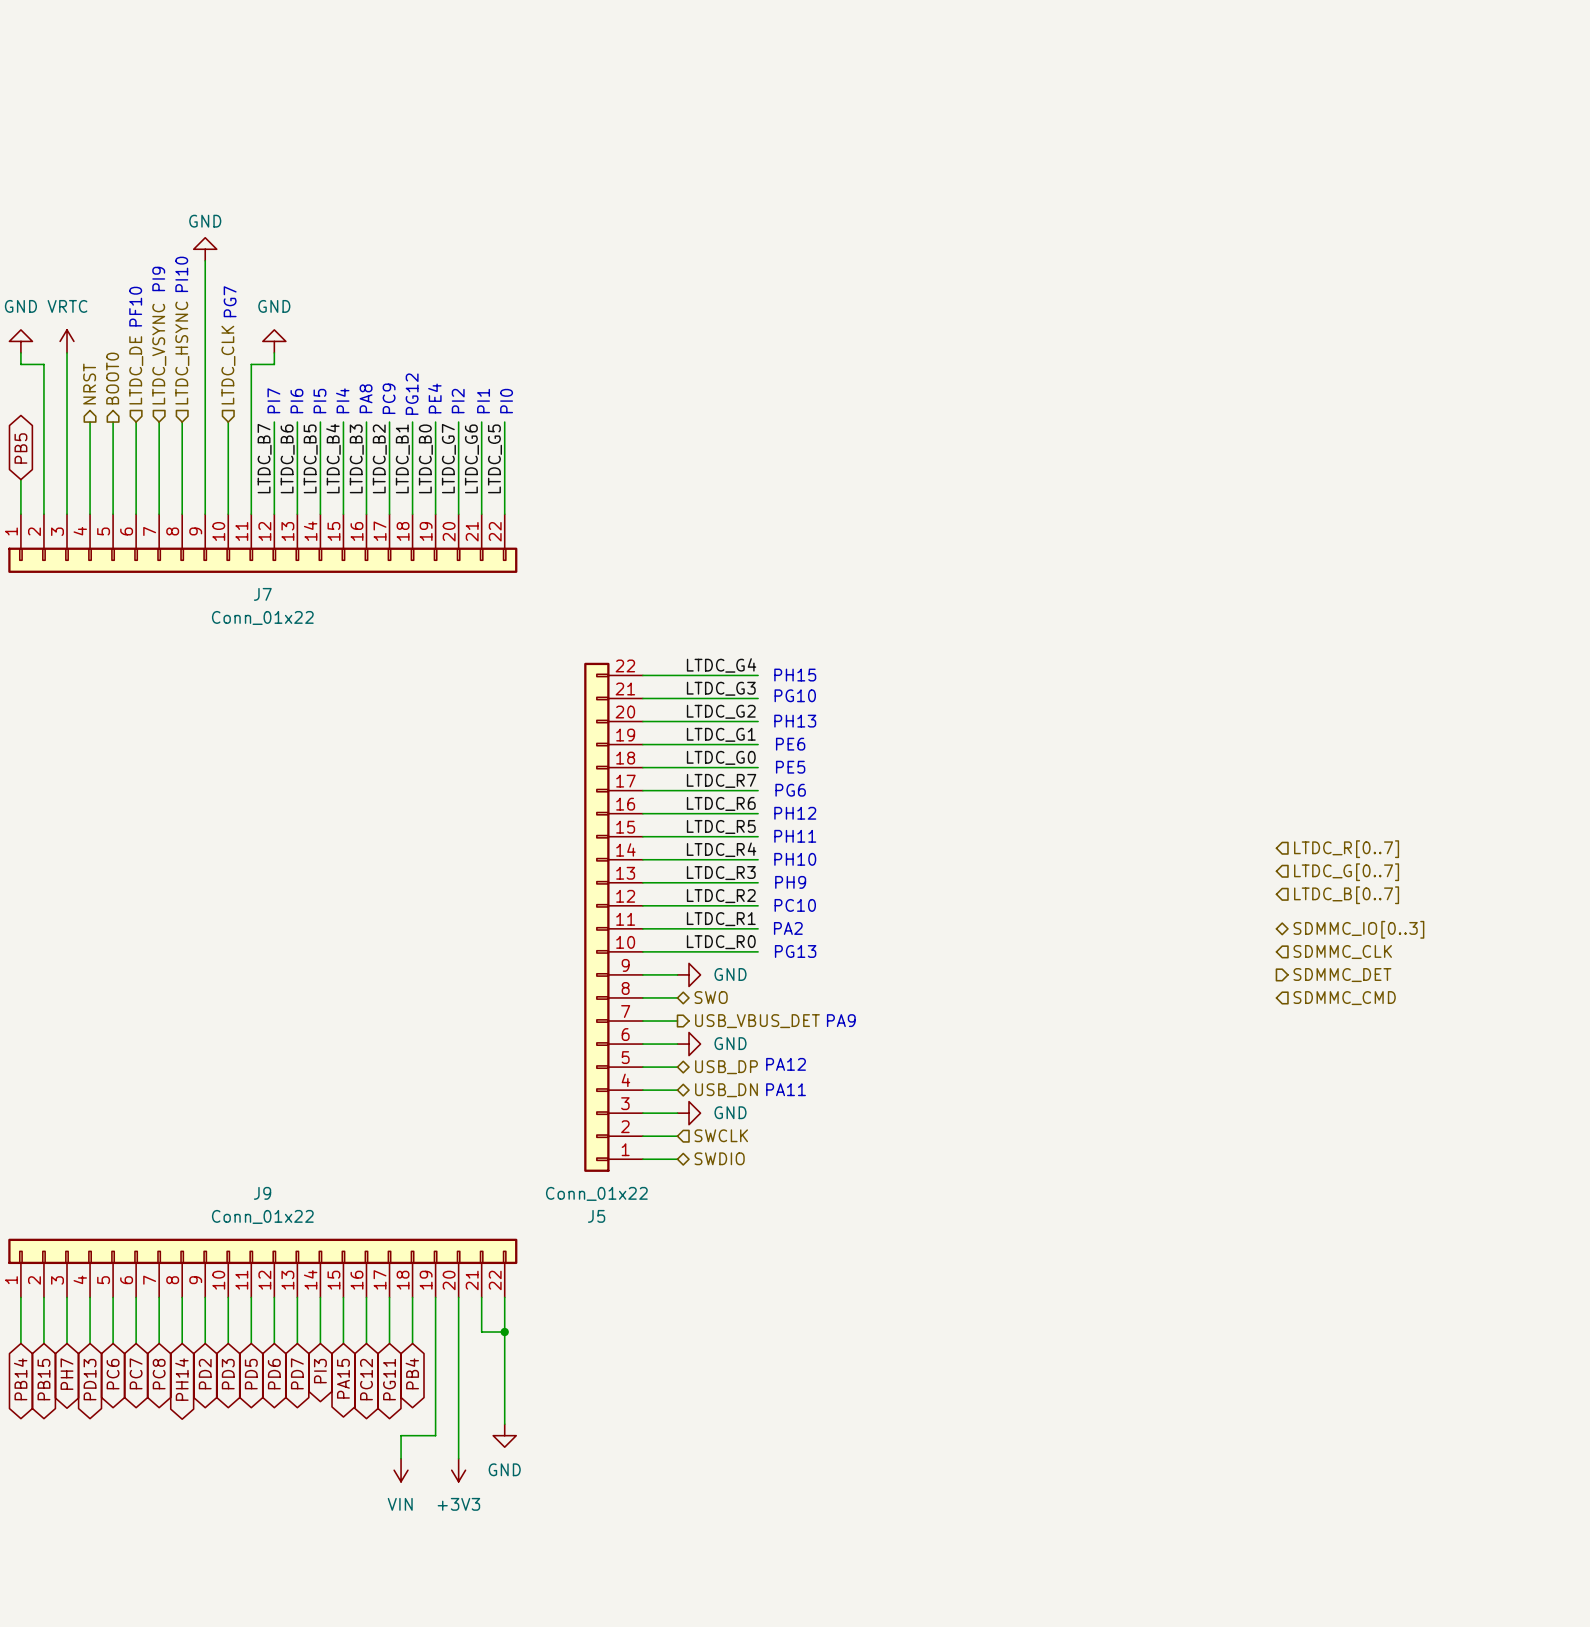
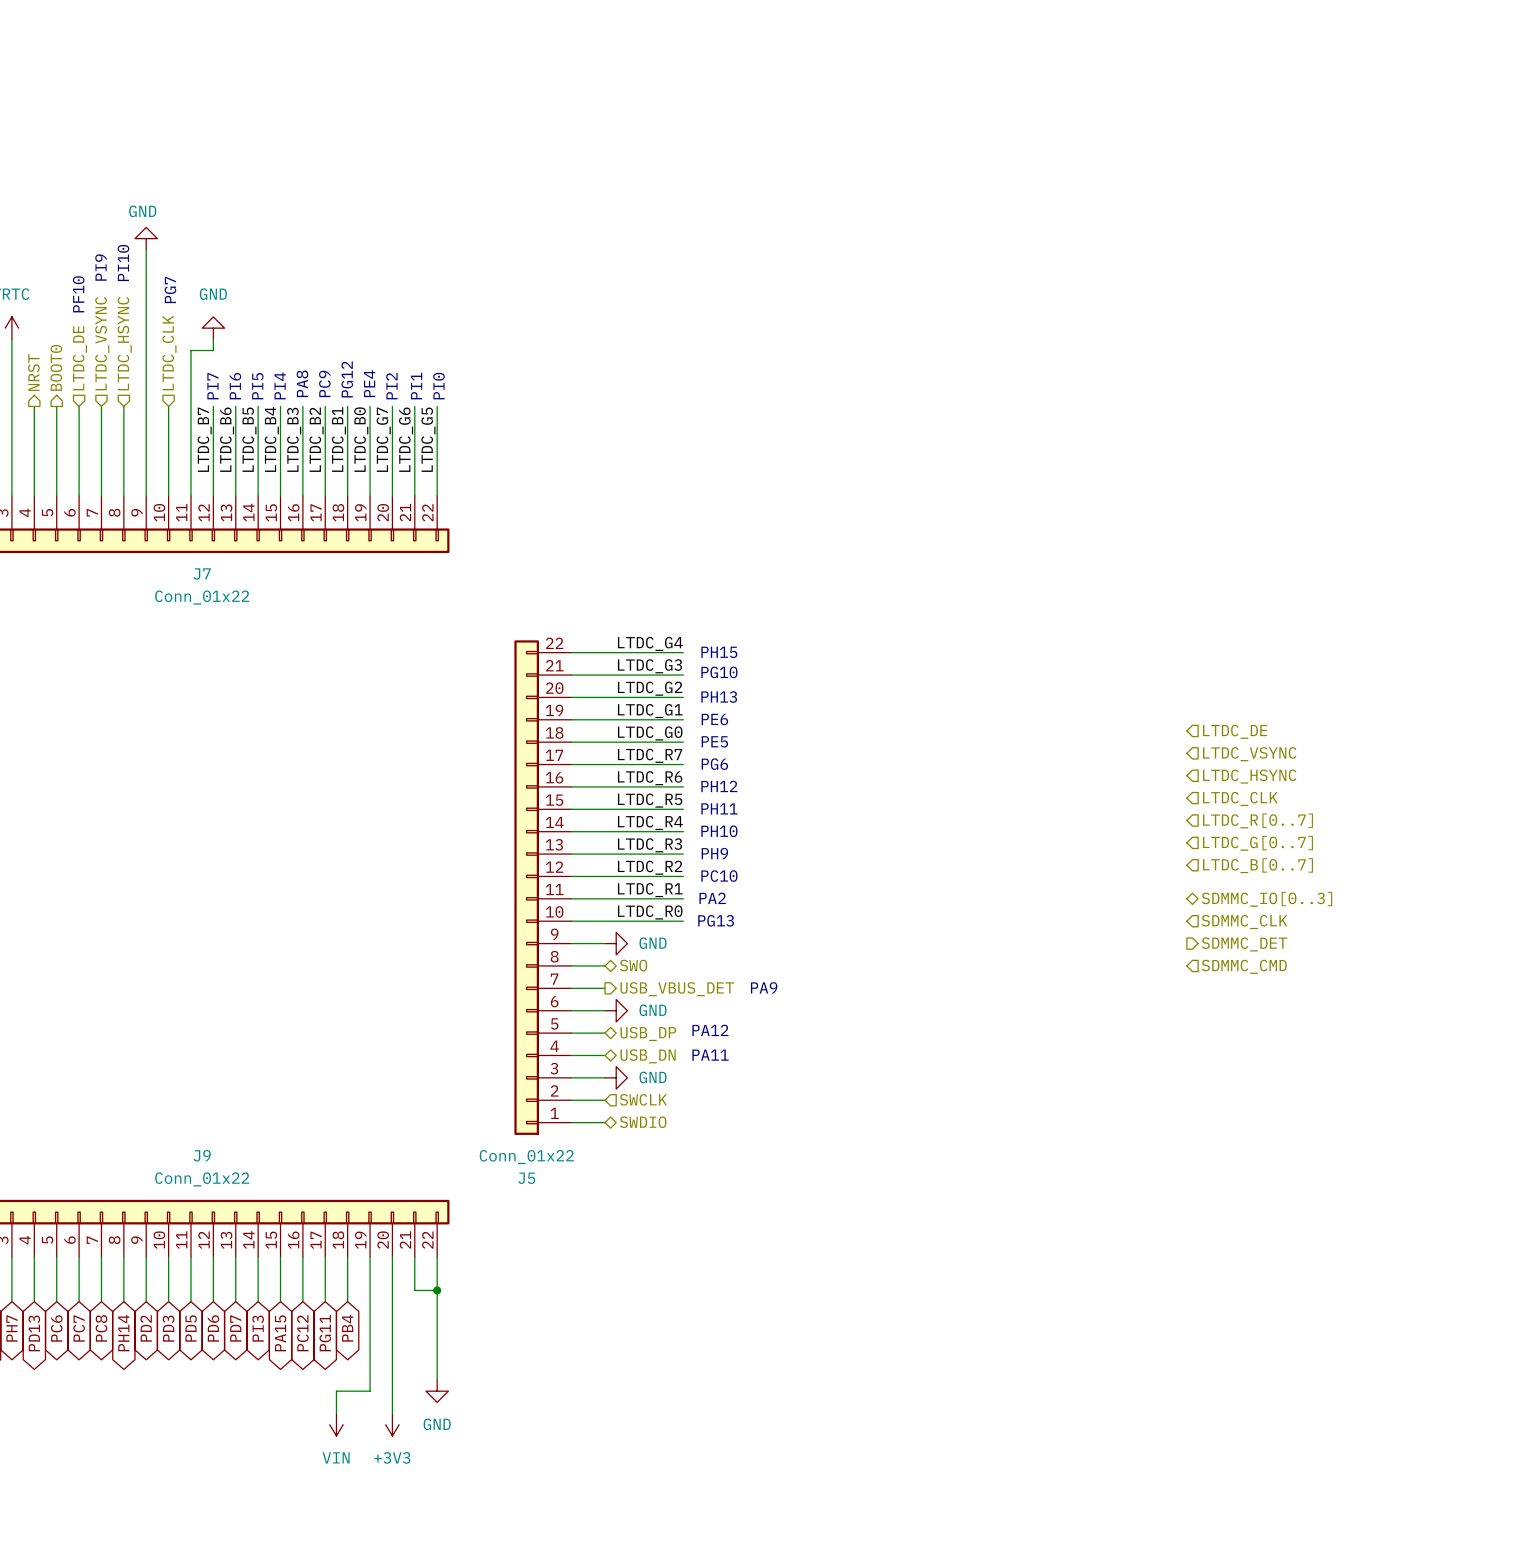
hierarchical label: none -> LTDC_DE (1235, 731)
hierarchical label: none -> LTDC_VSYNC (1249, 754)
hierarchical label: none -> LTDC_HSYNC (1249, 776)
hierarchical label: none -> LTDC_CLK (1240, 798)

